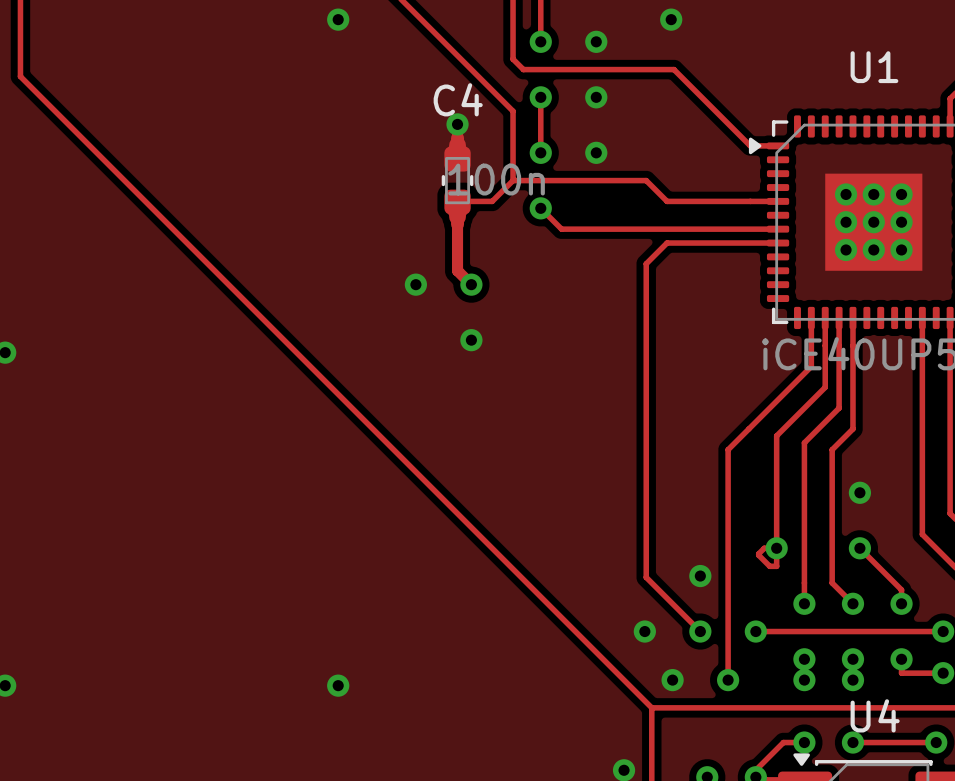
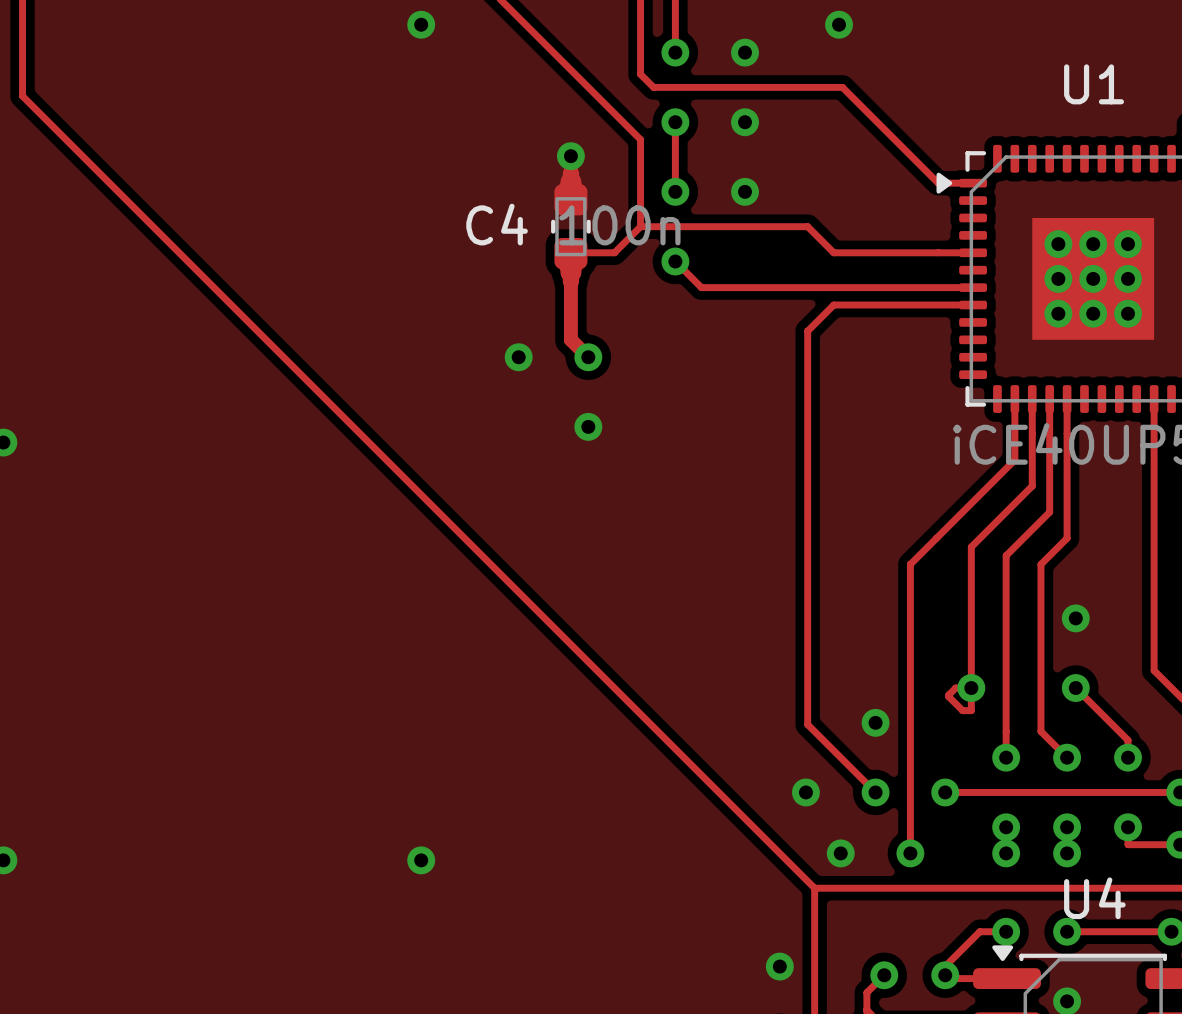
C4 name position: C4 (458, 99) -> C4 (497, 224)

